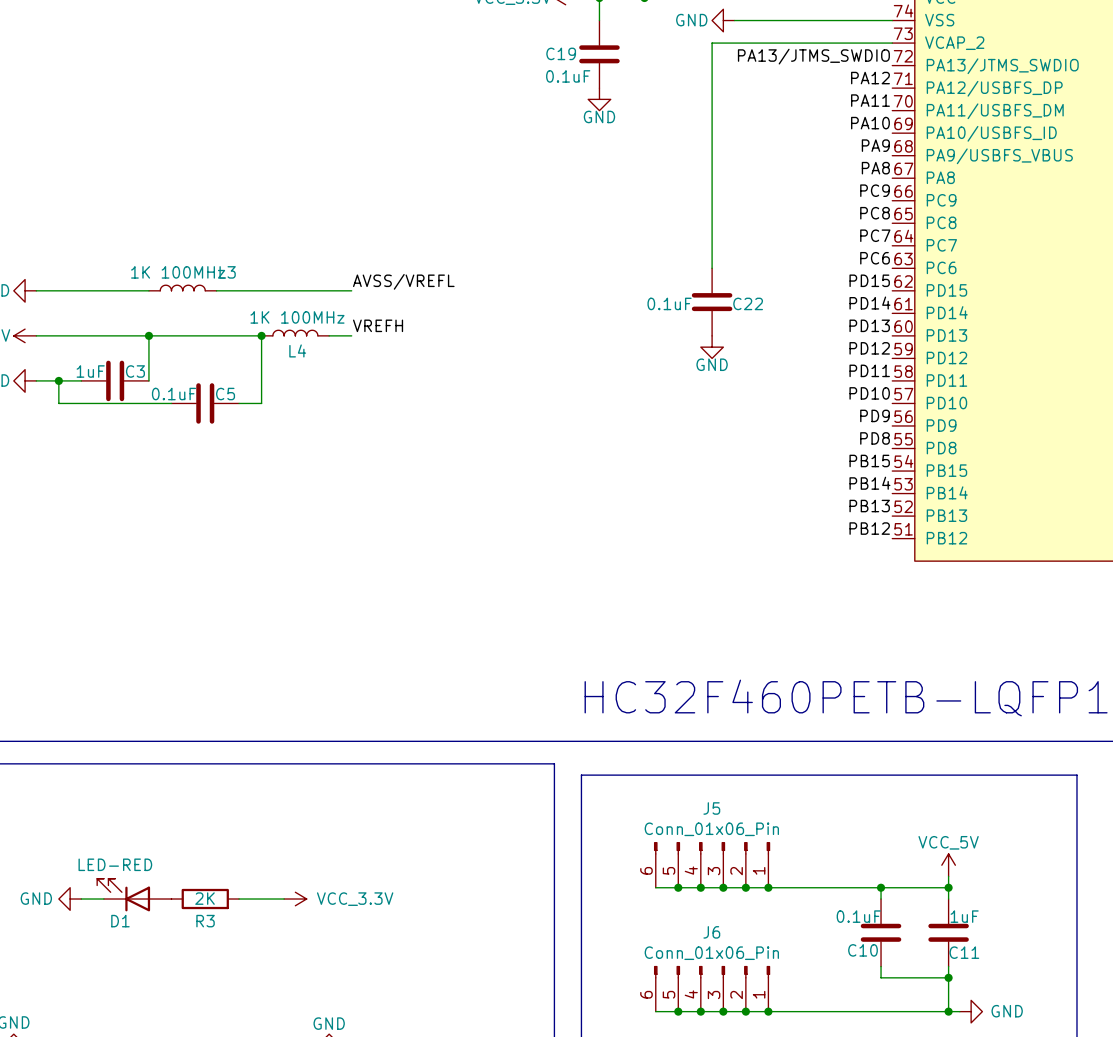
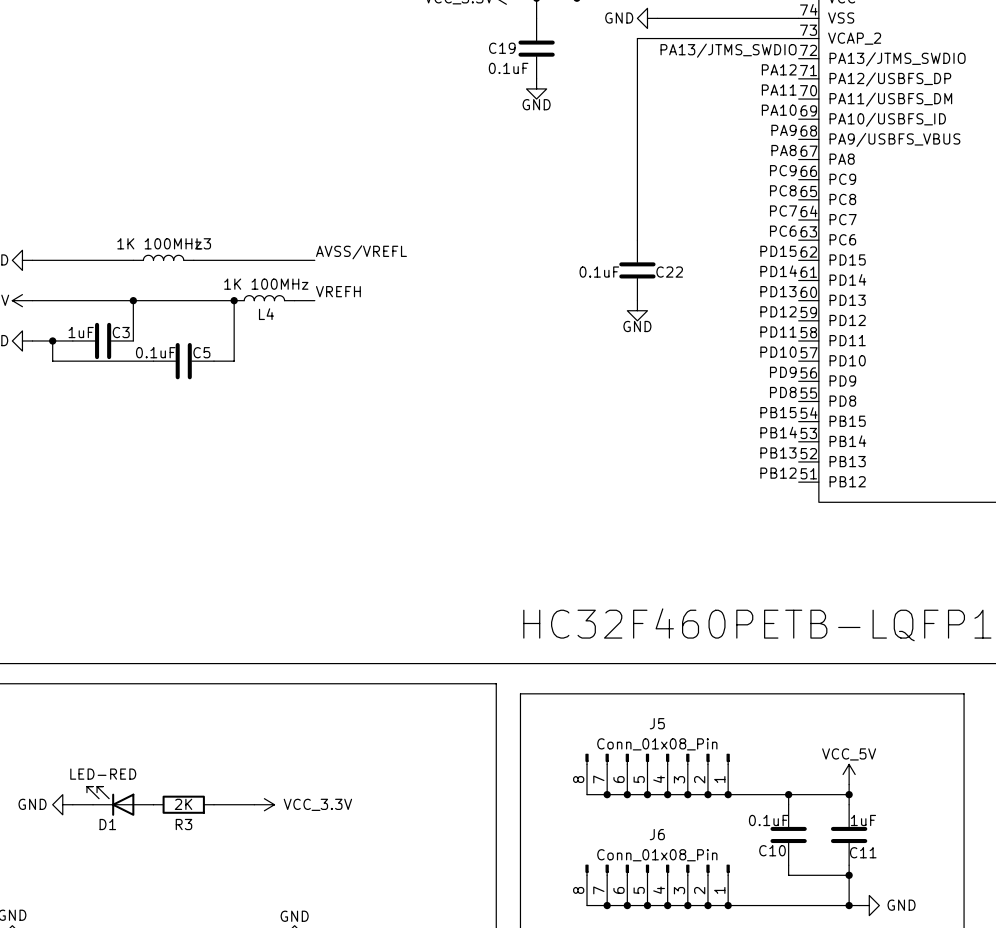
J5 value: Conn_01x06_Pin (711, 829) -> Conn_01x08_Pin (657, 744)
J5 symbol: [653, 842, 771, 888] -> [585, 753, 730, 795]
junction: none -> (707, 794)
junction: none -> (728, 794)
J6 value: Conn_01x06_Pin (711, 953) -> Conn_01x08_Pin (657, 855)
J6 symbol: [653, 965, 771, 1012] -> [585, 864, 730, 906]
junction: none -> (707, 905)
junction: none -> (728, 905)

